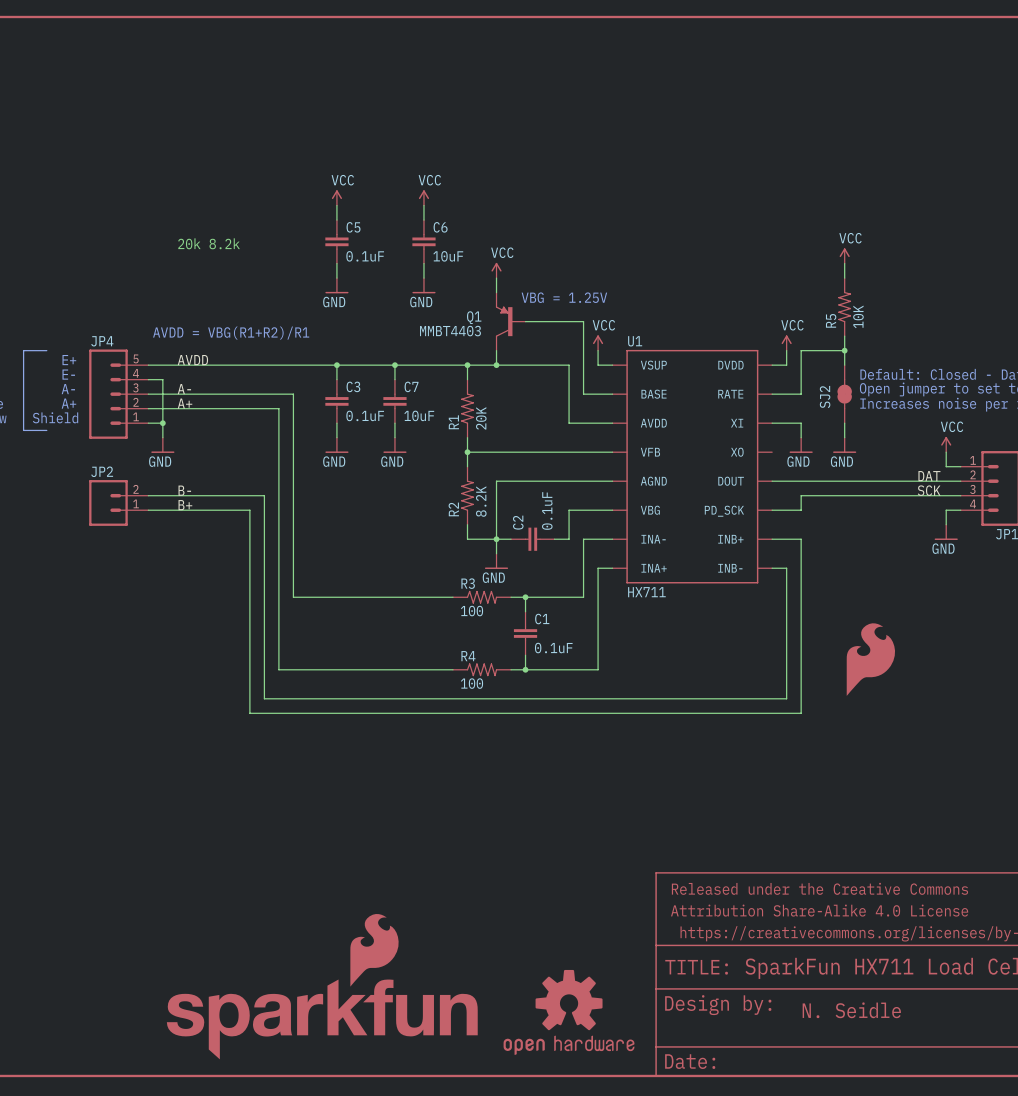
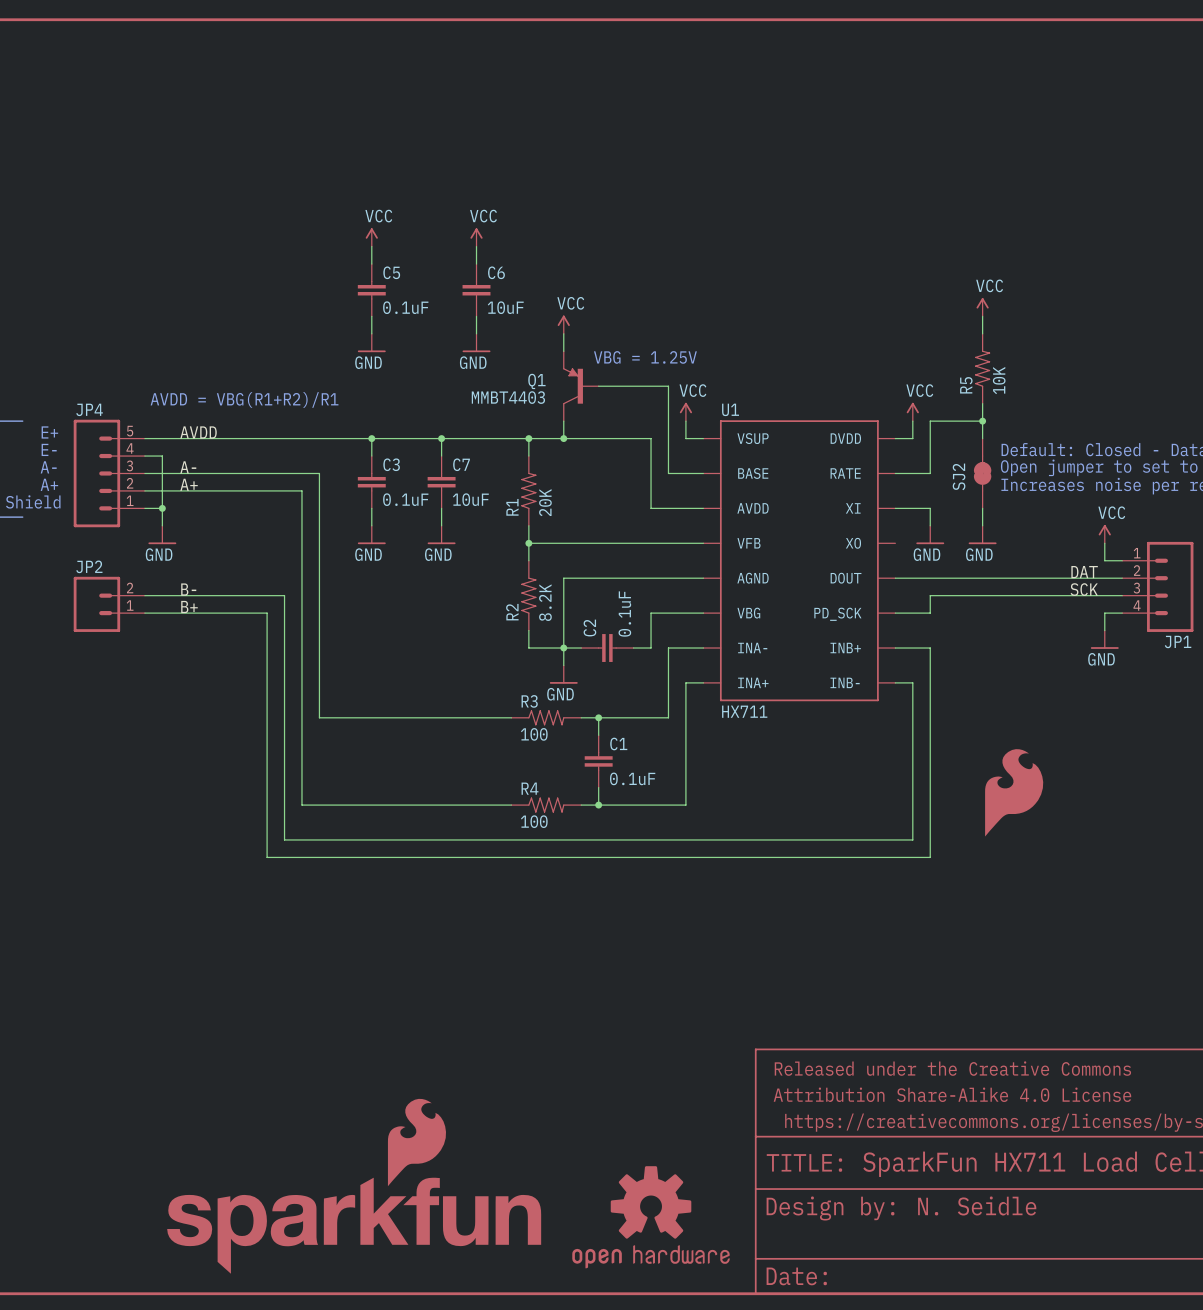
text: 20k 8.2k (209, 243) -> none
part text: none -> N. Seidle (977, 1206)
text: N. Seidle (851, 1010) -> none

